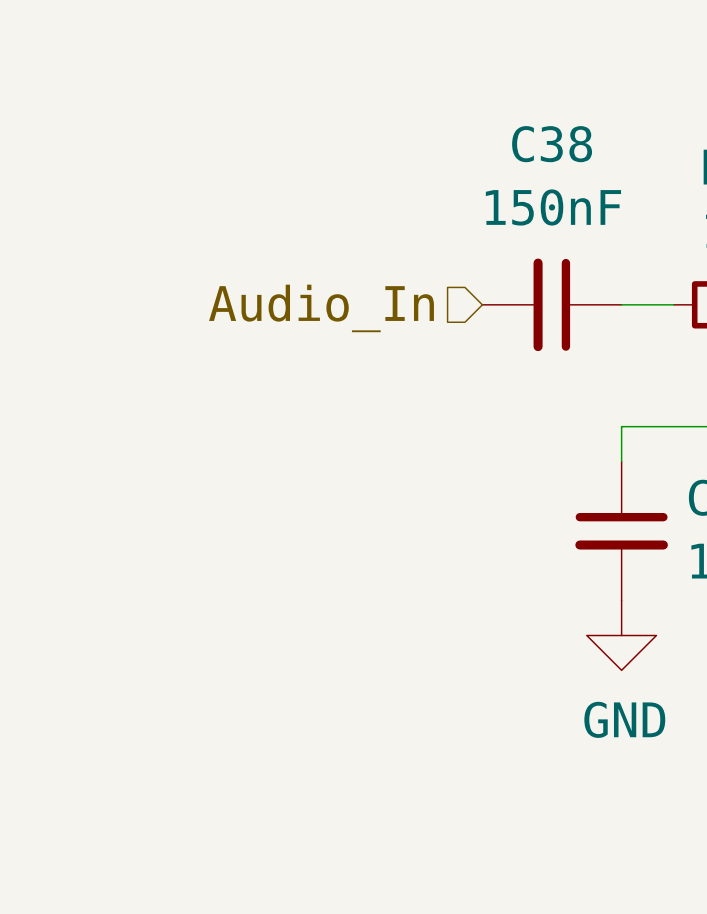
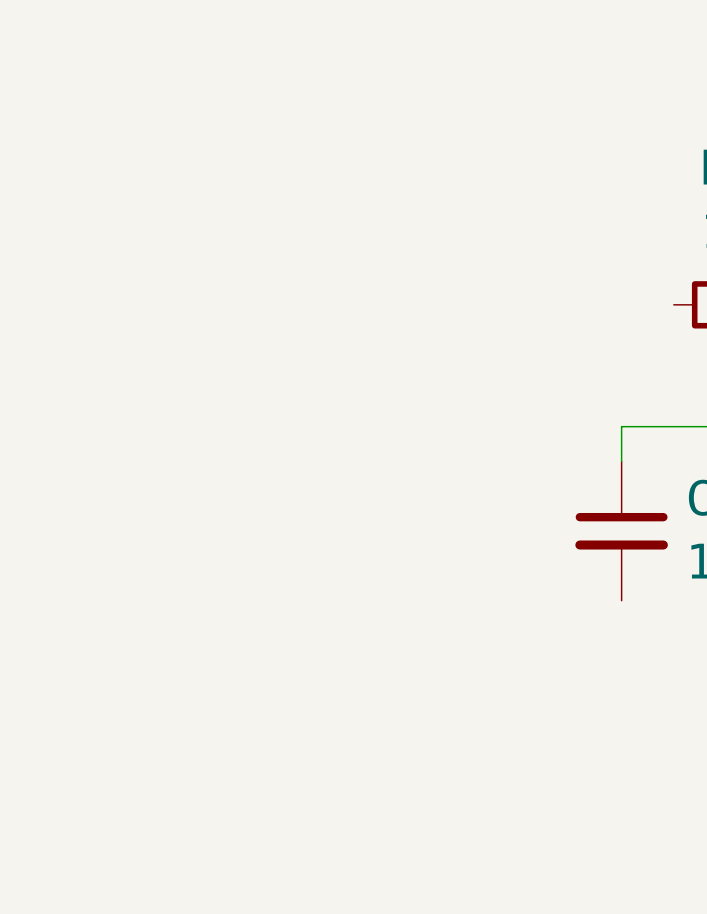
C38: 150nF (552, 304) -> none
wire: (621, 304) (673, 304) -> none
hierarchical label: Audio_In (321, 308) -> none
power symbol: GND (621, 635) -> none

